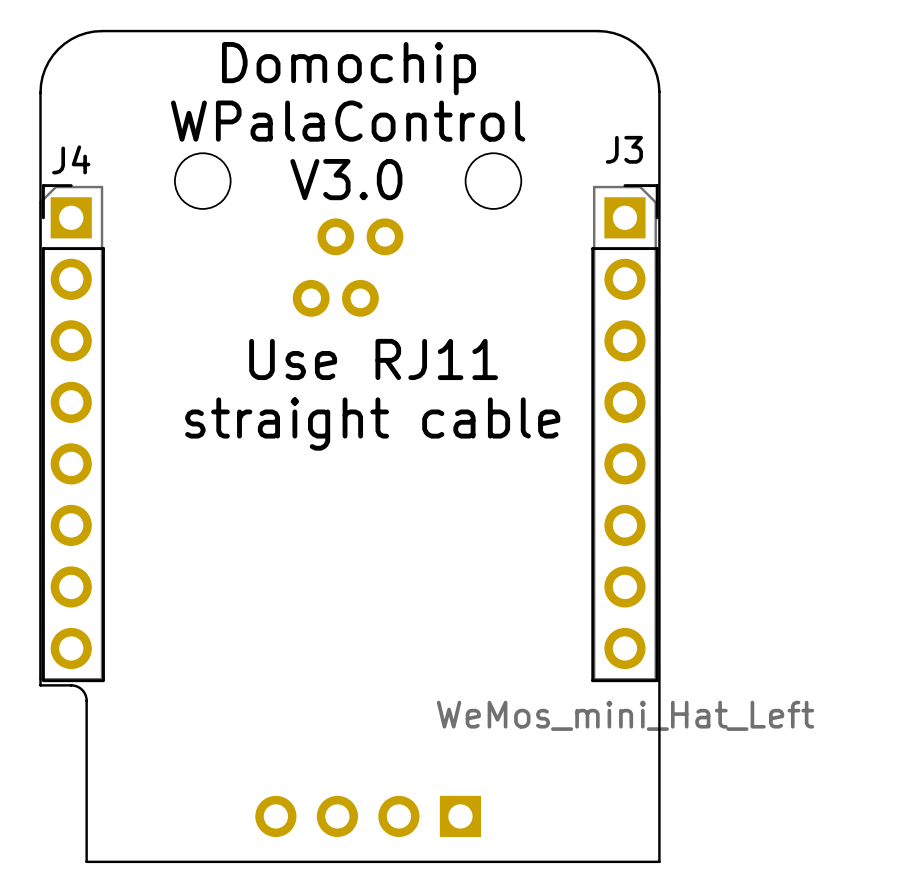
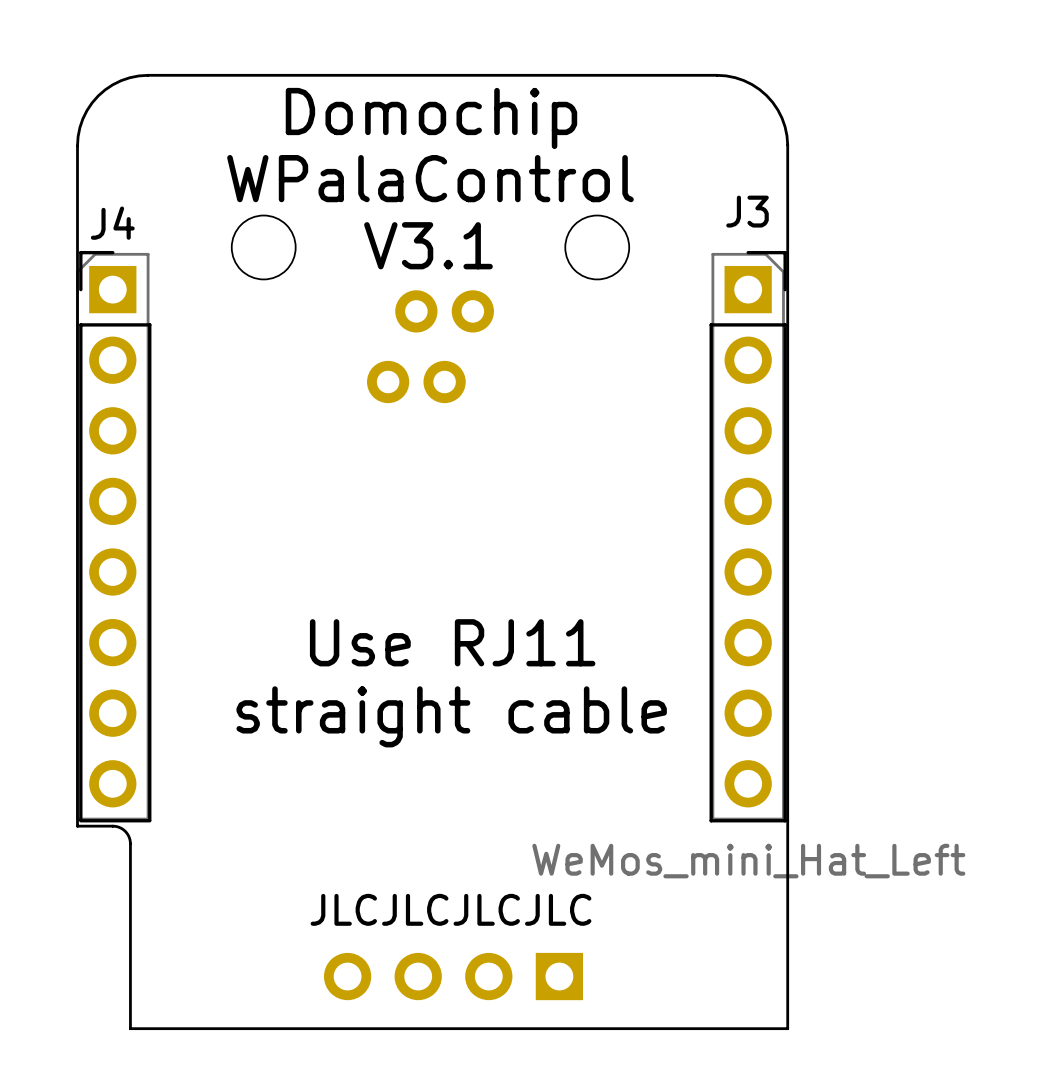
text: V3.0 (346, 179) -> V3.1 (428, 245)
text position: Use RJ11 (373, 359) -> Use RJ11 (452, 642)
text position: straight cable (372, 424) -> straight cable (451, 716)
text: none -> JLCJLCJLCJLC (451, 909)

